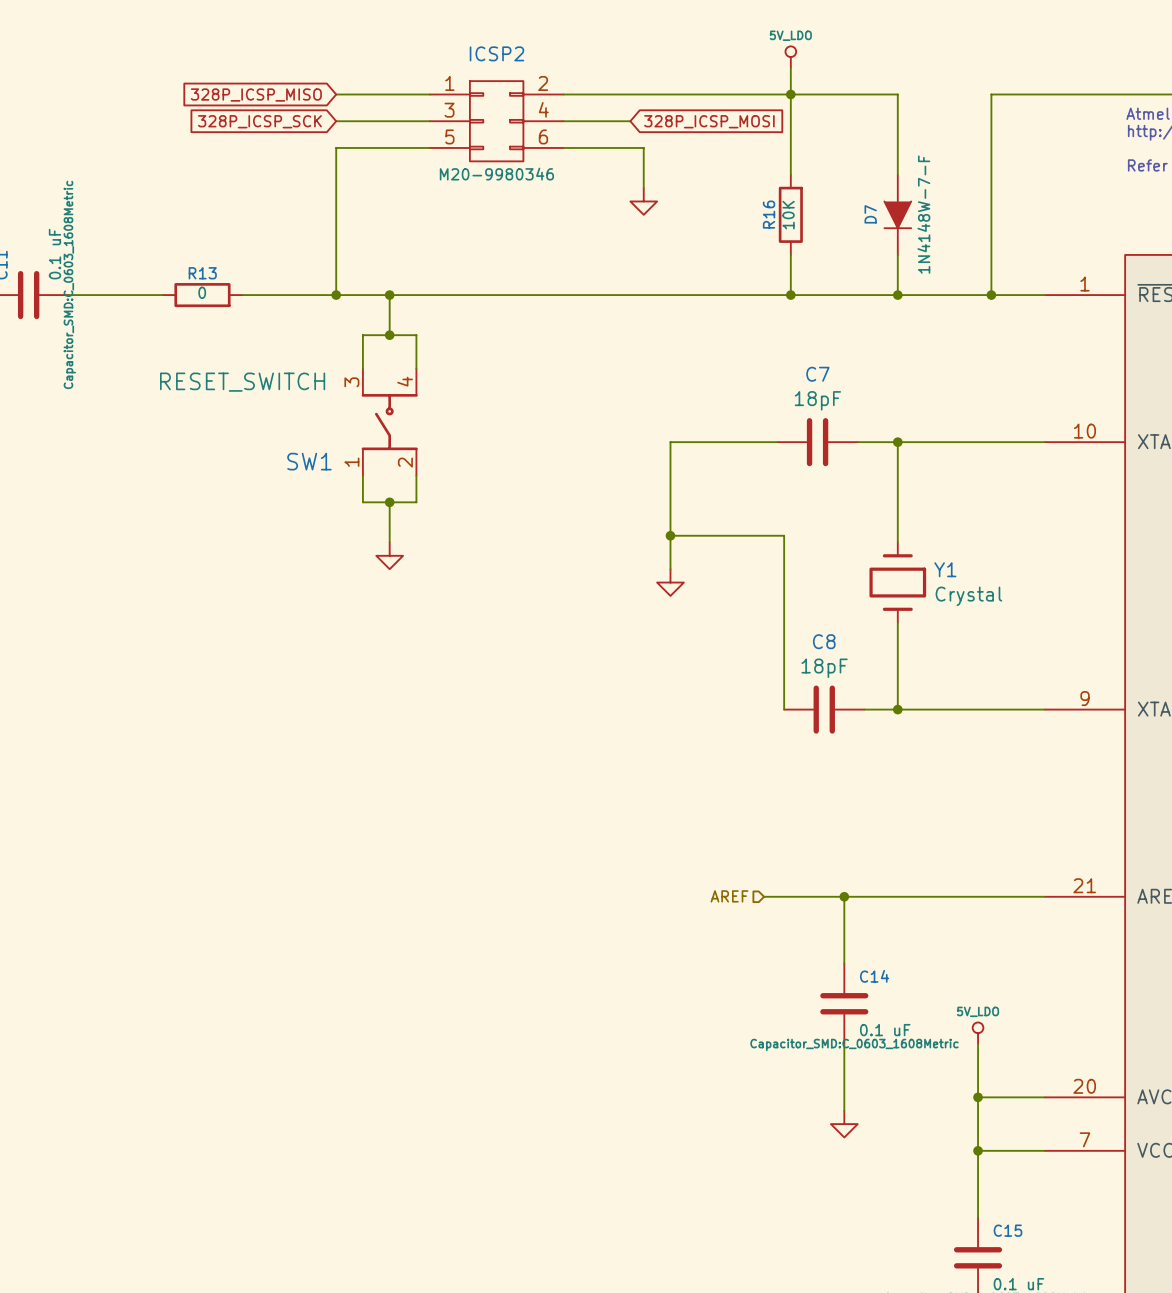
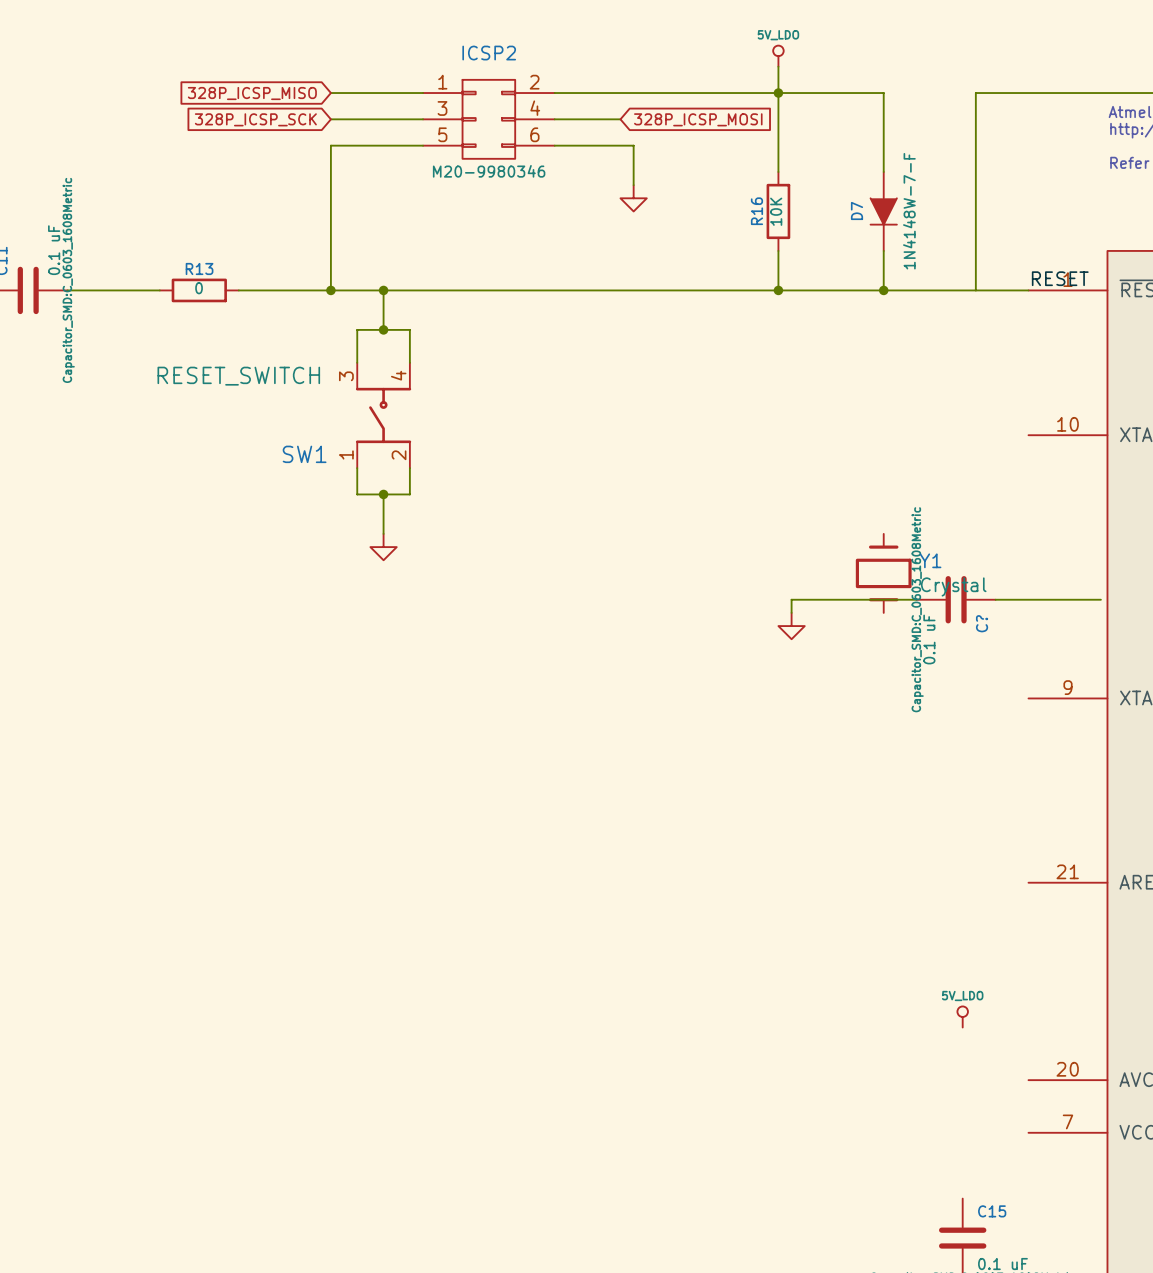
label: none -> RESET (1060, 278)
junction: (991, 295) -> none
wire: (777, 442) (670, 442) (670, 569) -> none
C7: 18pF (817, 442) -> none
wire: (857, 442) (1044, 442) -> none
wire: (897, 442) (897, 542) -> none
junction: (897, 442) -> none
wire: (670, 535) (784, 535) (784, 709) -> none
junction: (670, 535) -> none
power symbol position: (670, 582) -> (791, 626)
wire: none -> (916, 599) (791, 599) (791, 612)
C?: none -> 0.1 uF (956, 599)
wire: none -> (995, 599) (1100, 599)
wire: (897, 622) (897, 709) -> none
C8: 18pF (824, 709) -> none
wire: (864, 709) (1044, 709) -> none
junction: (897, 709) -> none
hierarchical label: AREF (729, 896) -> none
wire: (764, 896) (1044, 896) -> none
wire: (844, 896) (844, 963) -> none
junction: (844, 896) -> none
C14: 0.1 uF (844, 1003) -> none
wire: (844, 1043) (844, 1110) -> none
wire: (978, 1043) (978, 1217) -> none
wire: (978, 1097) (1044, 1097) -> none
junction: (978, 1097) -> none
power symbol: (844, 1124) -> none
wire: (978, 1150) (1044, 1150) -> none
junction: (978, 1150) -> none

